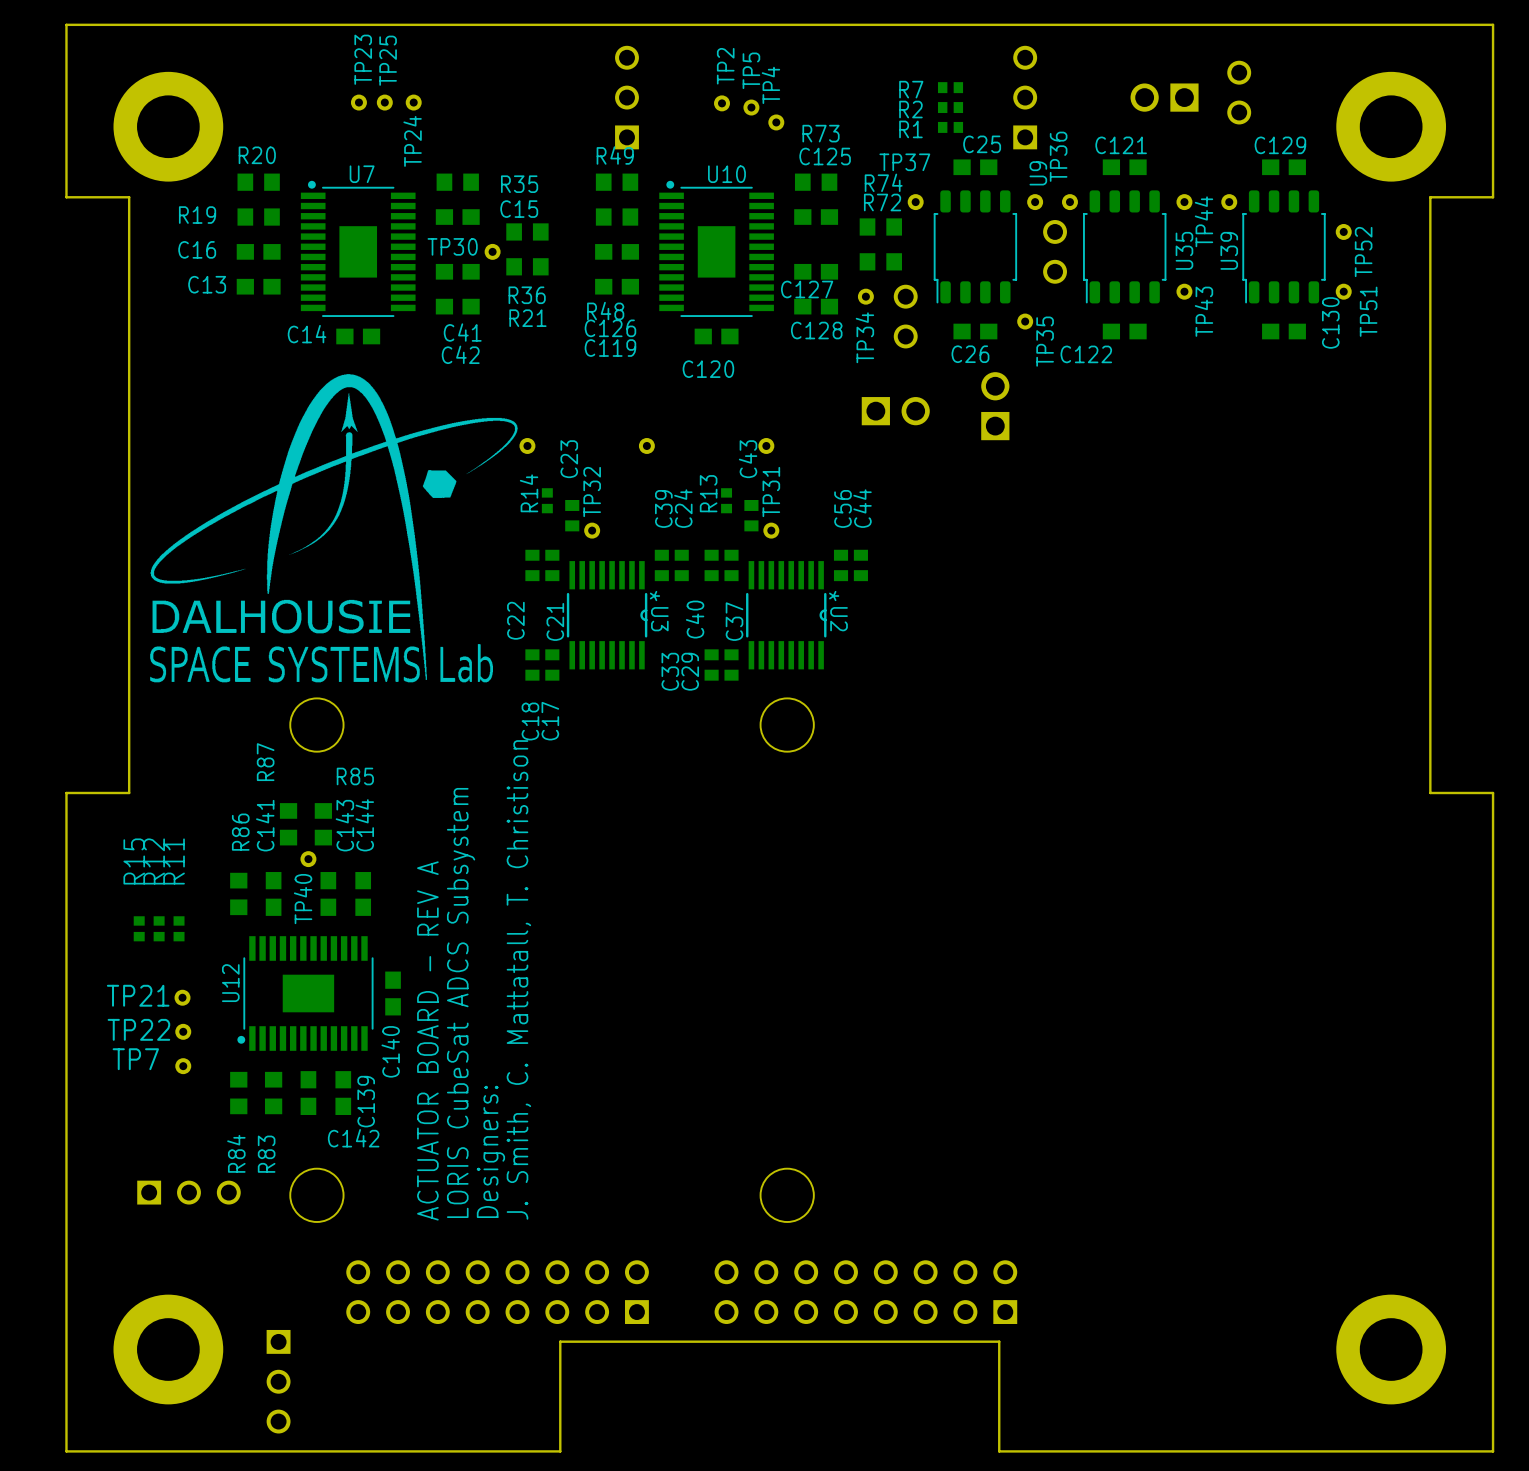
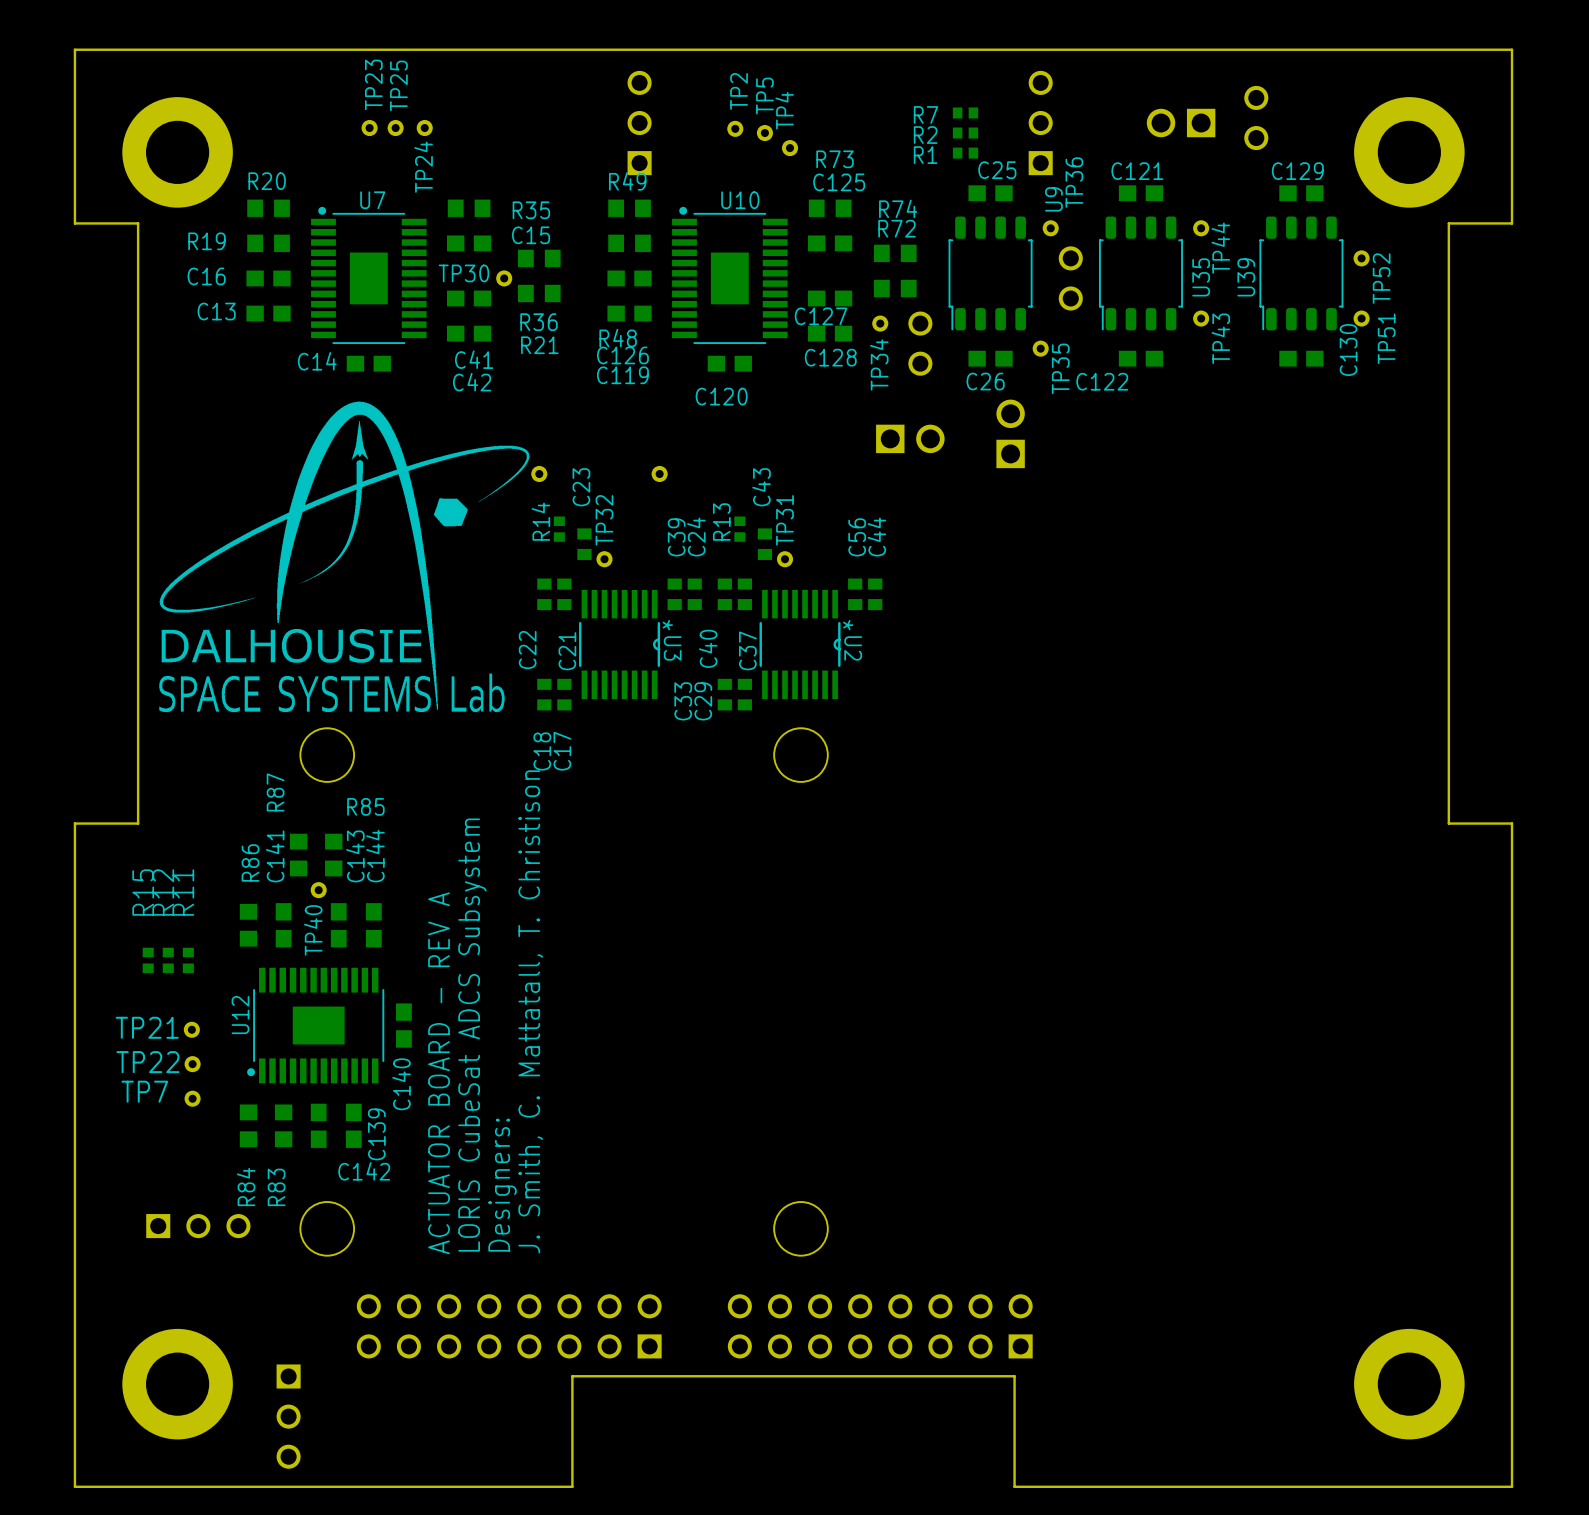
TP37: (915, 202) -> none
part: (1069, 202) -> none
part: (1229, 202) -> none
part: (766, 445) -> none

